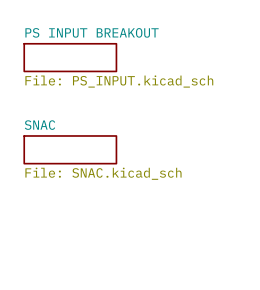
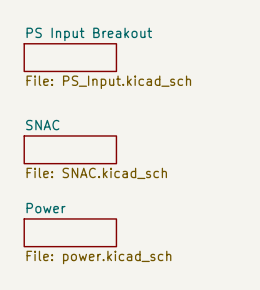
sheet PS INPUT BREAKOUT name: PS INPUT BREAKOUT (92, 32) -> PS Input Breakout (89, 34)
sheet PS INPUT BREAKOUT value: File: PS_INPUT.kicad_sch (119, 81) -> File: PS_Input.kicad_sch (108, 82)
sheet Power: none -> File: power.kicad_sch (70, 232)

